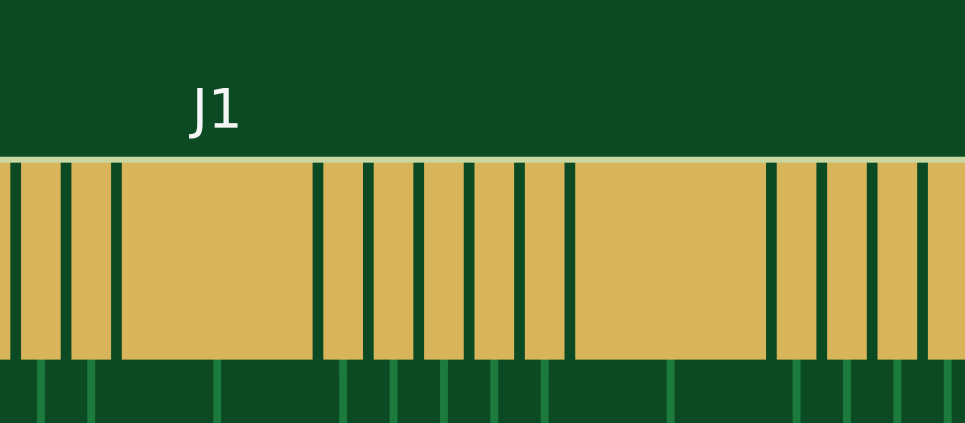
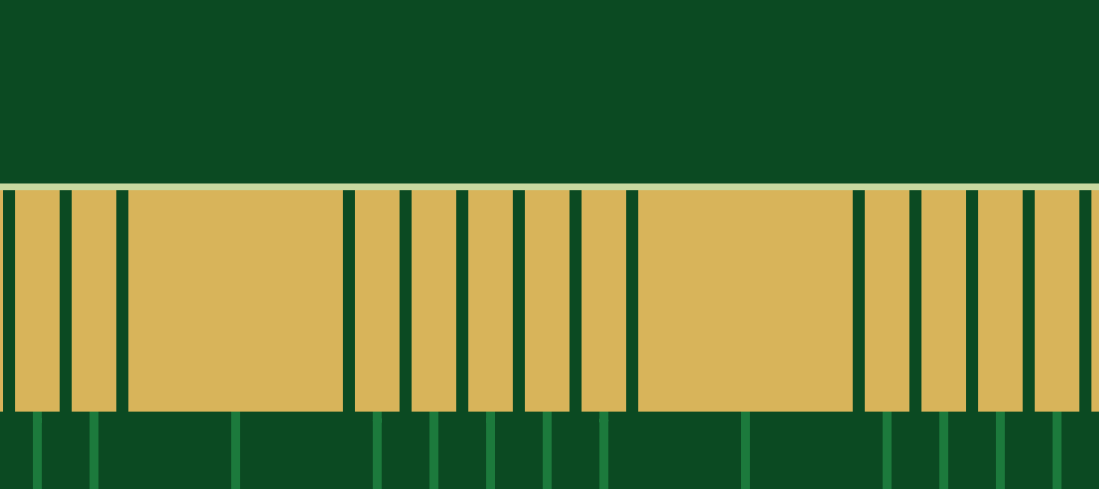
J1 name: J1 (213, 113) -> none

